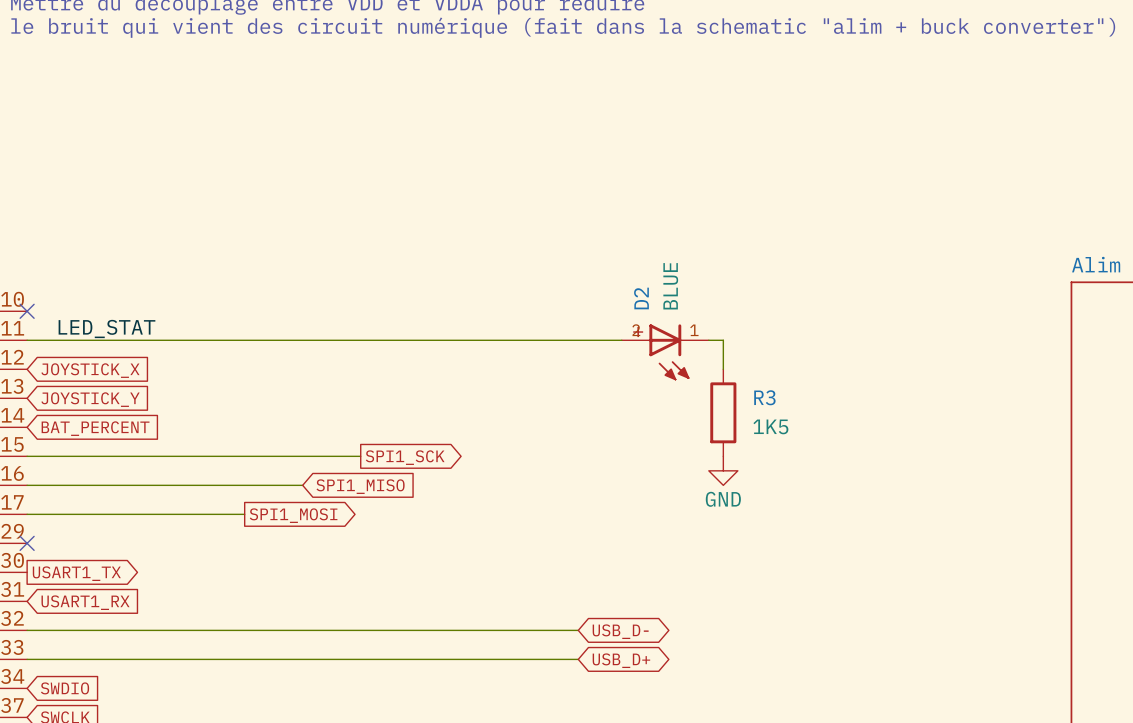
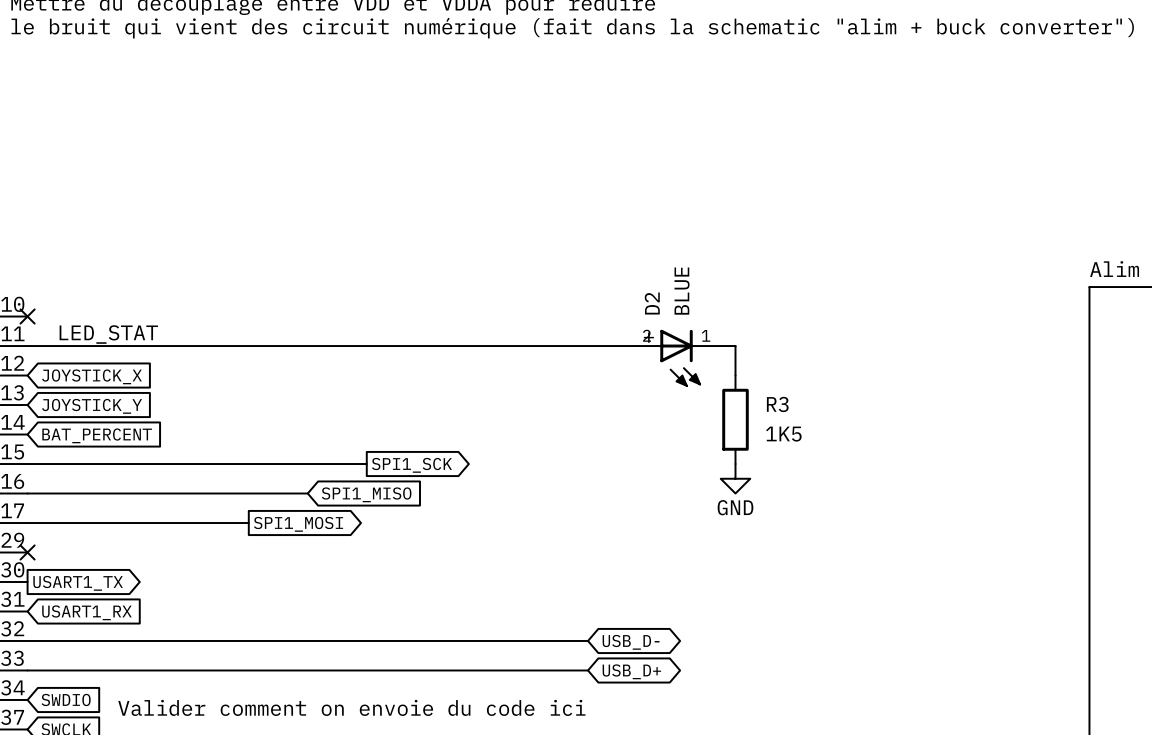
text: none -> Valider comment on envoie du code ici (351, 707)

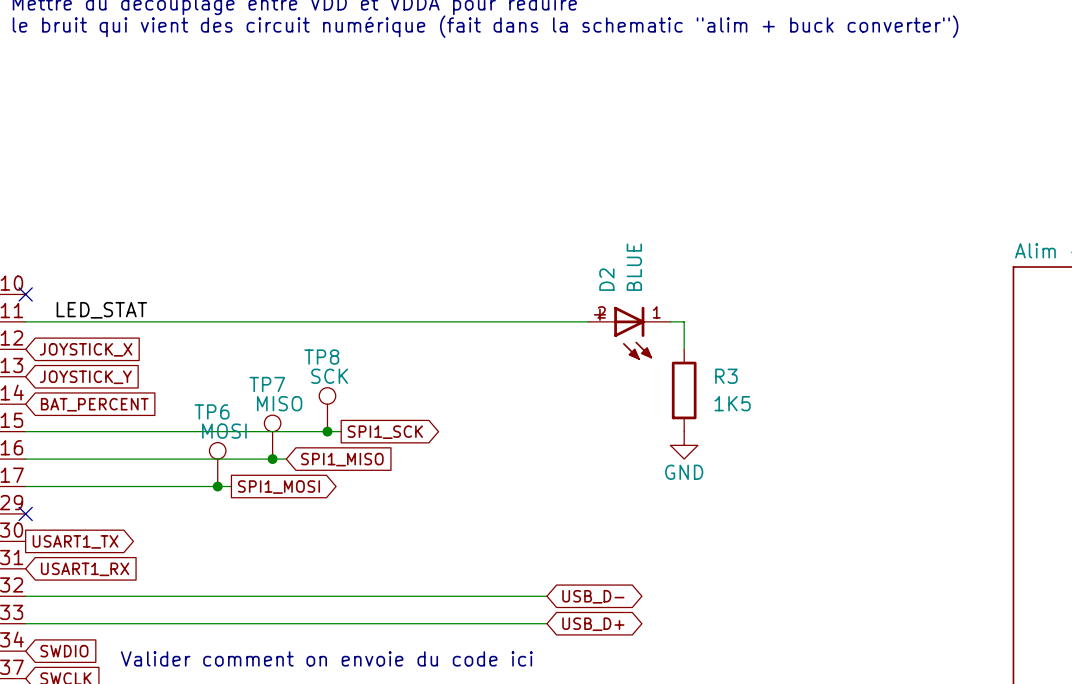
TP8: none -> SCK (327, 409)
junction: none -> (327, 431)
TP7: none -> MISO (272, 437)
junction: none -> (272, 459)
TP6: none -> MOSI (217, 464)
junction: none -> (217, 486)

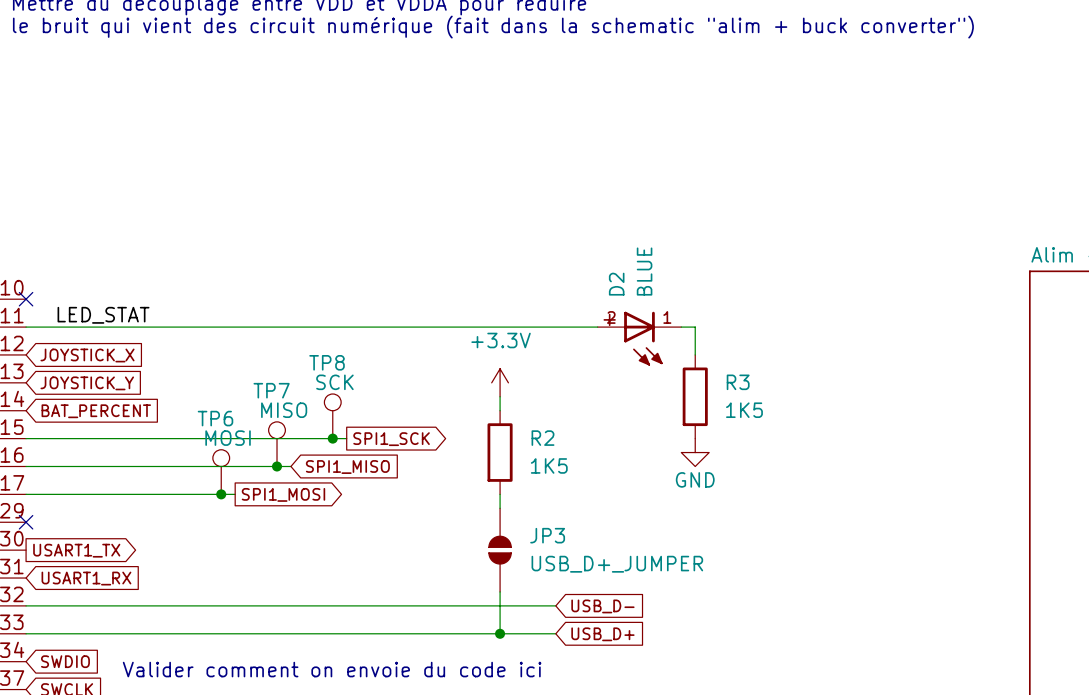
power symbol: none -> +3.3V (500, 382)
wire: none -> (500, 396) (500, 410)
R2: none -> 1K5 (500, 452)
wire: none -> (500, 494) (500, 508)
JP3: none -> USB_D+_JUMPER (500, 550)
wire: none -> (500, 591) (500, 633)
global label shape: bidirectional (593, 596) -> input (602, 606)
junction: none -> (500, 633)
global label shape: bidirectional (593, 624) -> input (602, 634)

